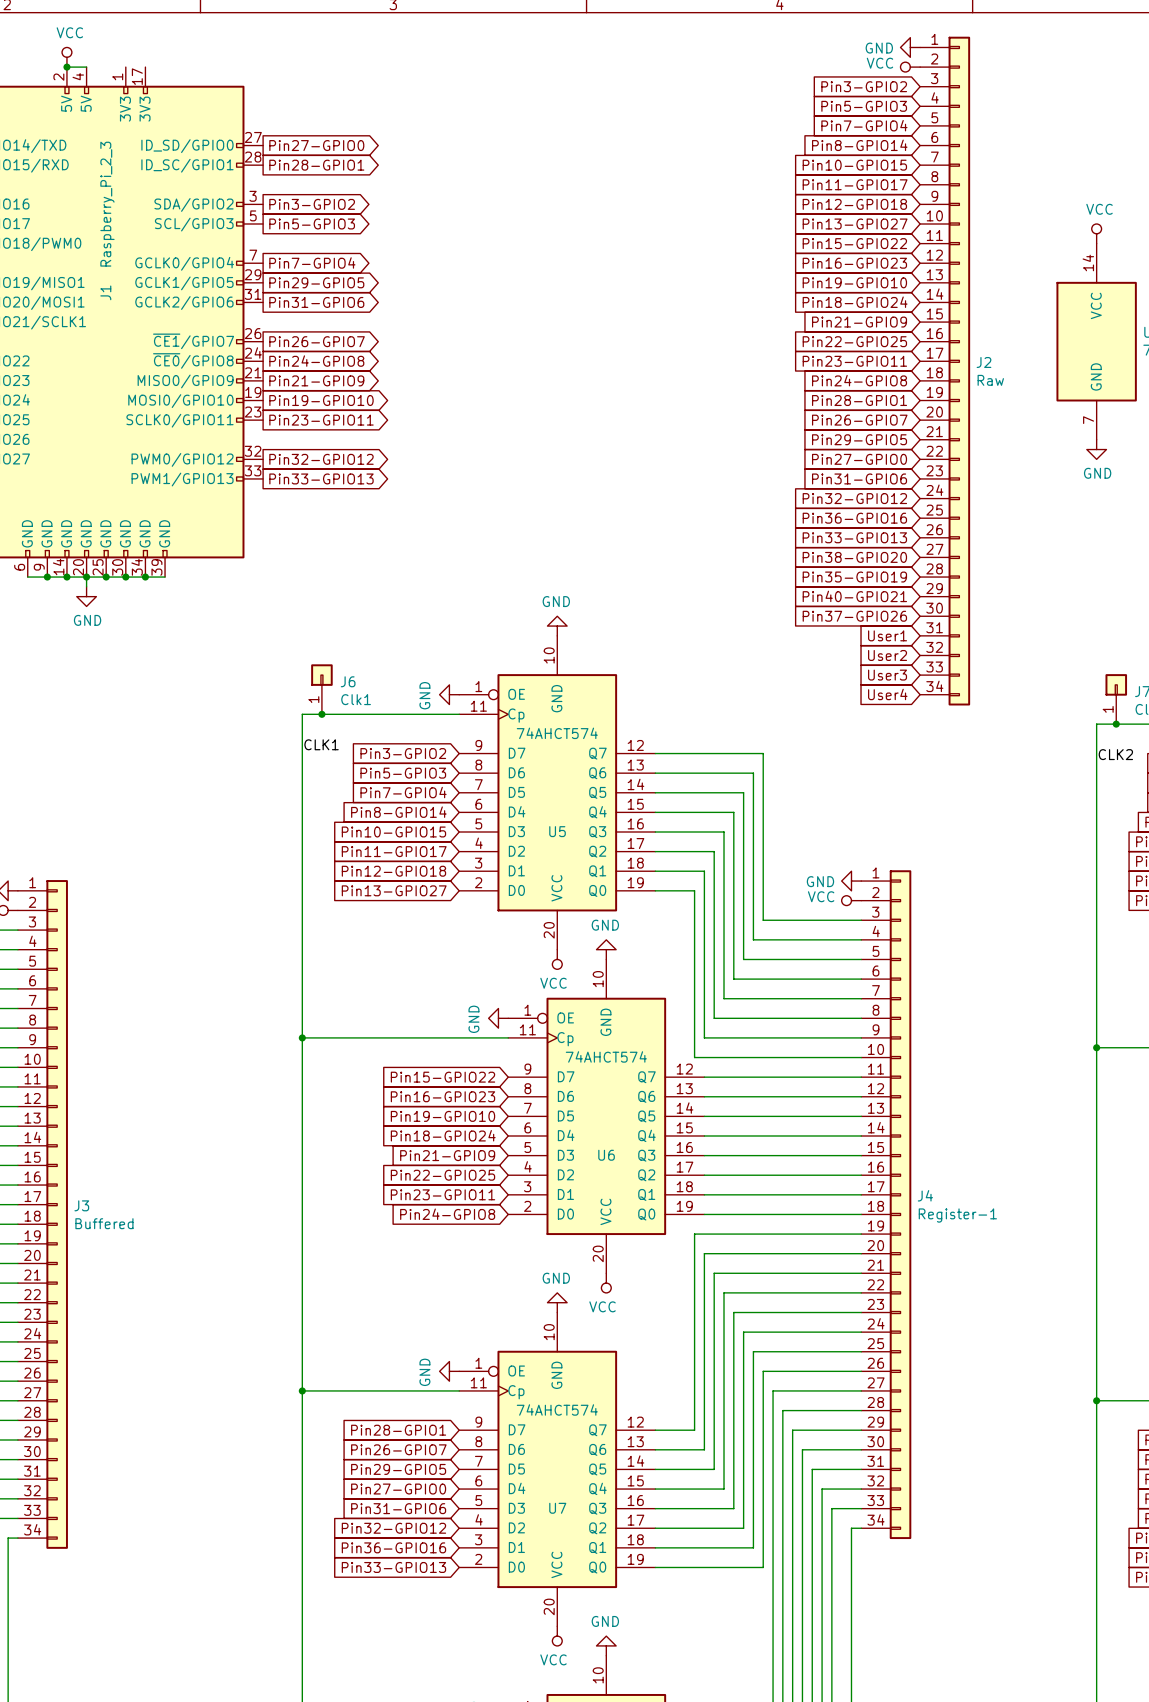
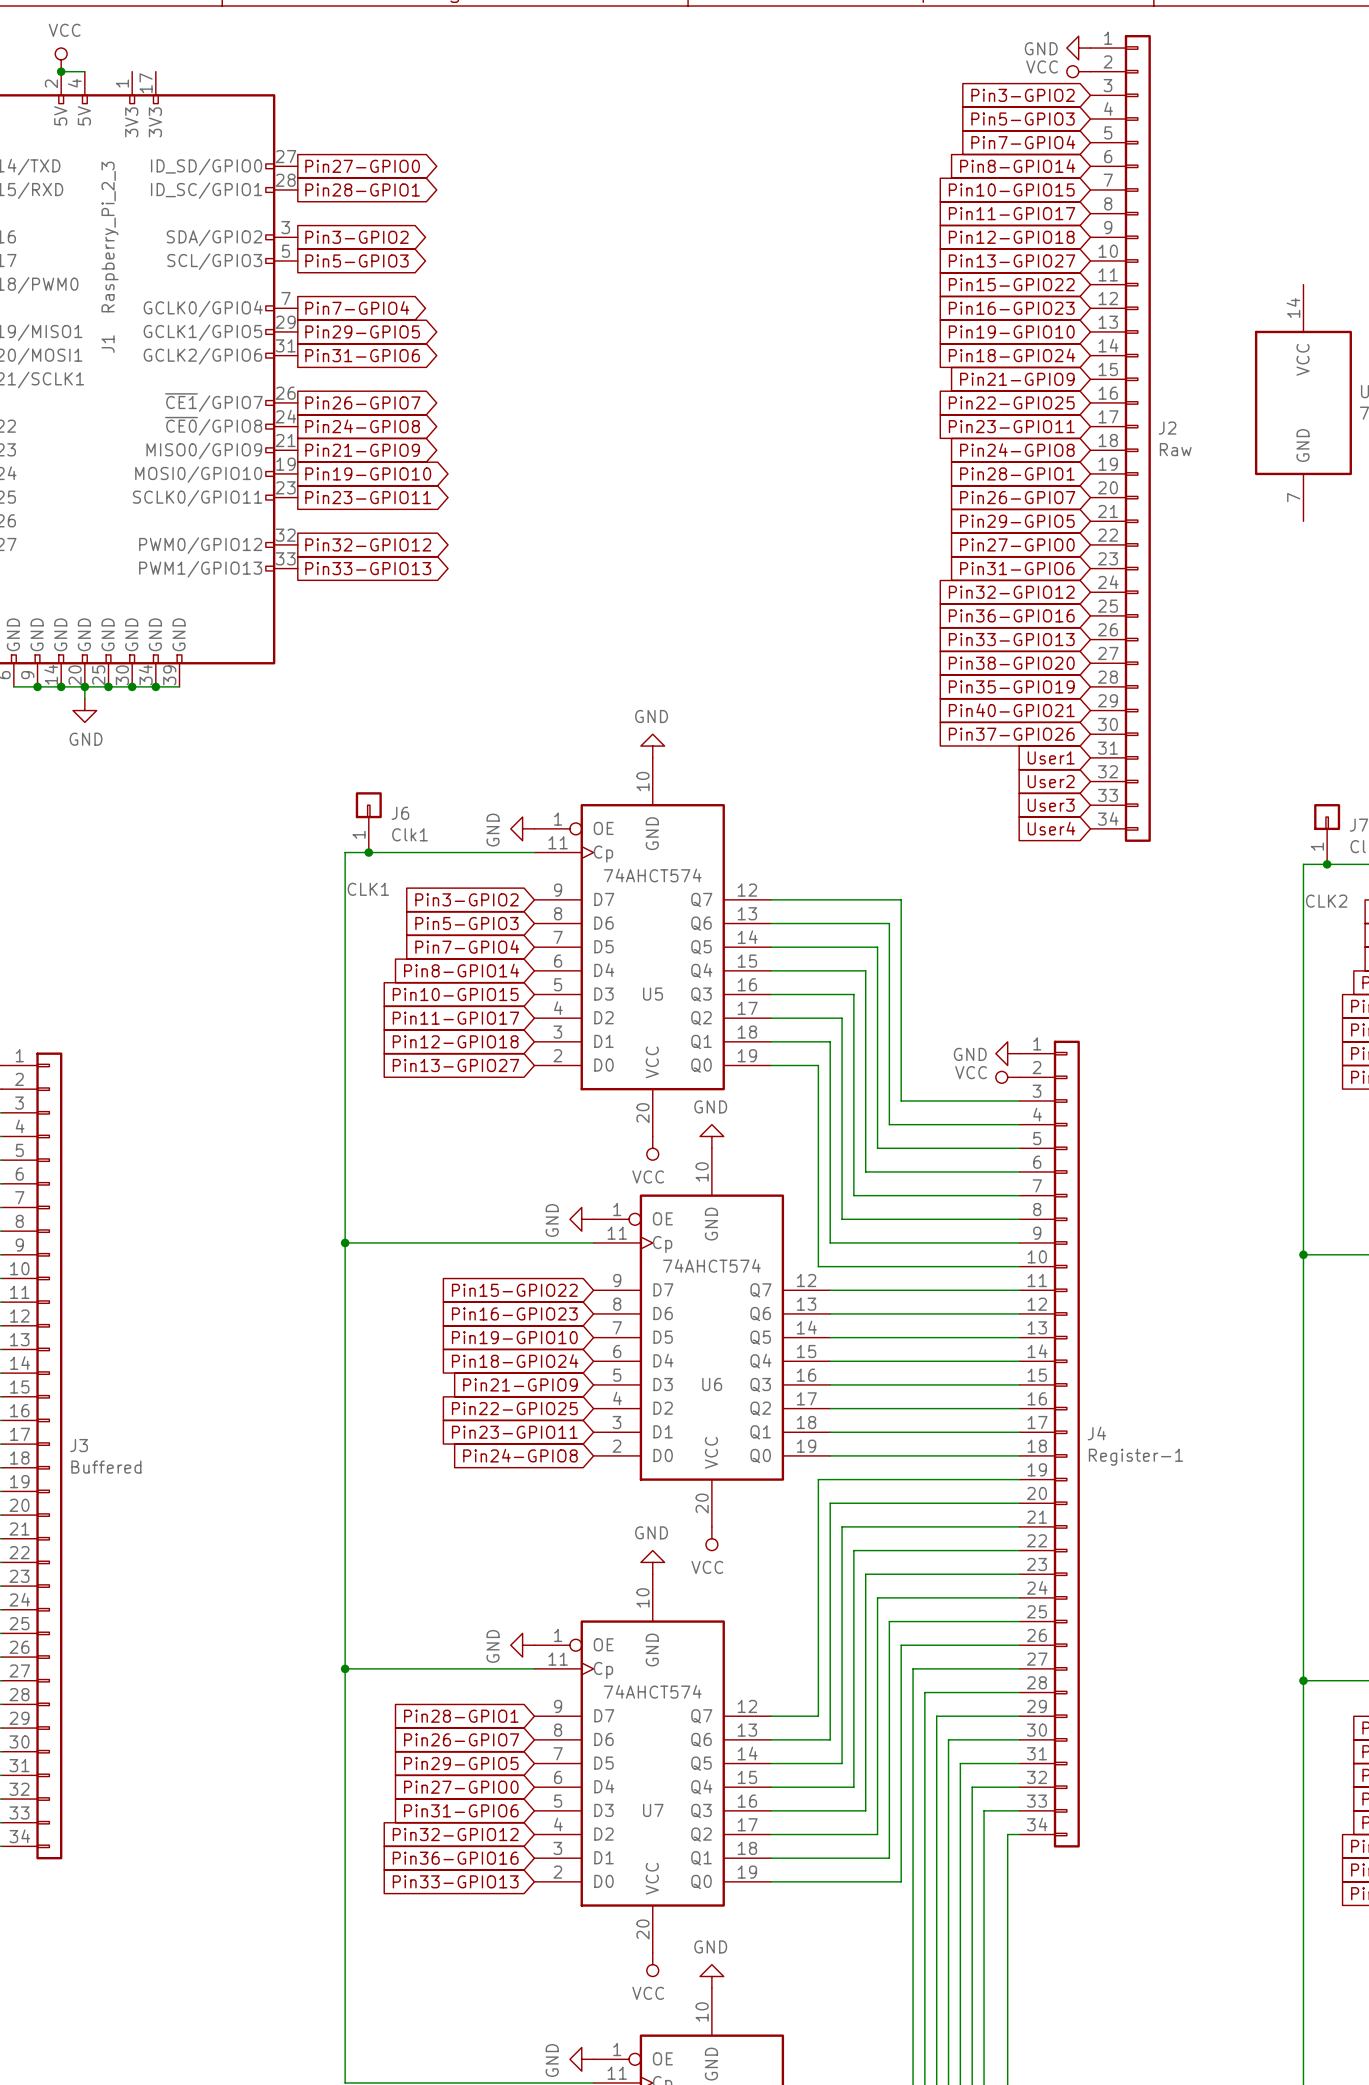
power symbol: VCC (1096, 233) -> none
power symbol: GND (1096, 449) -> none

